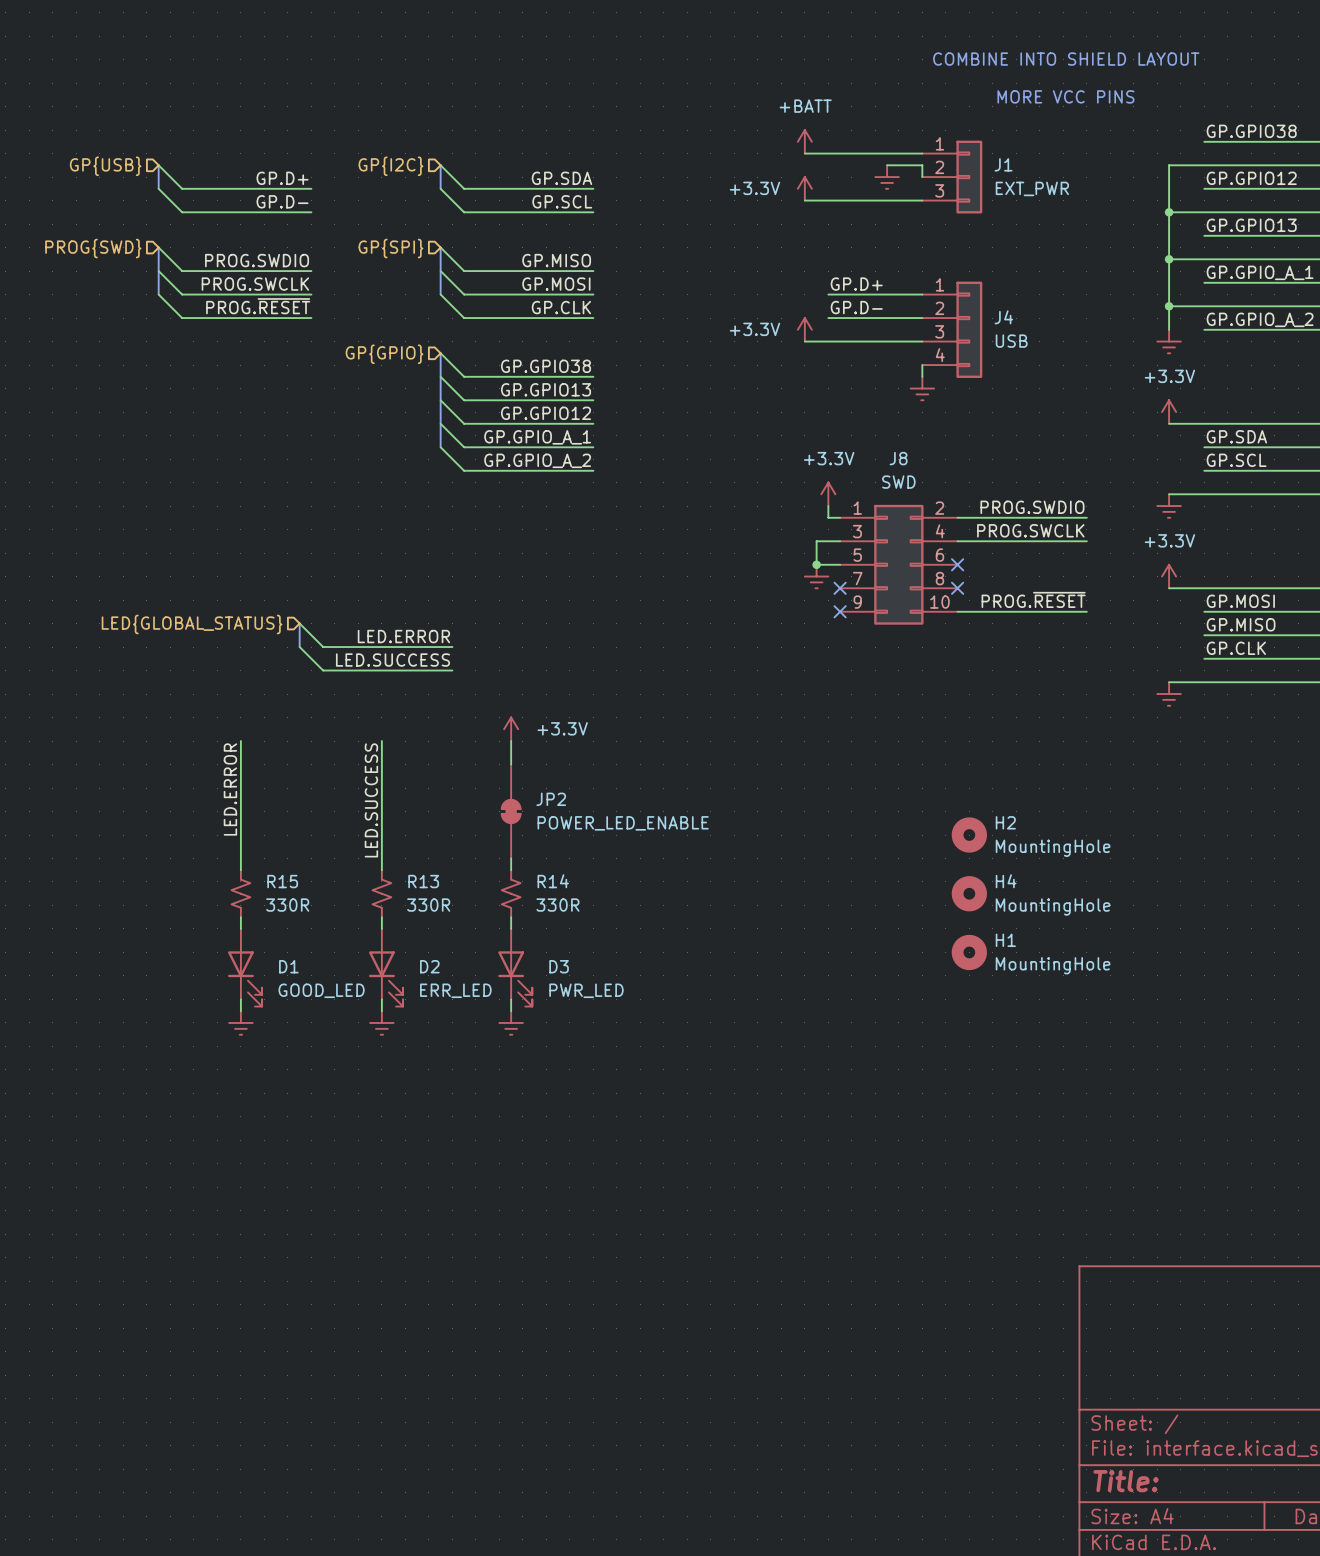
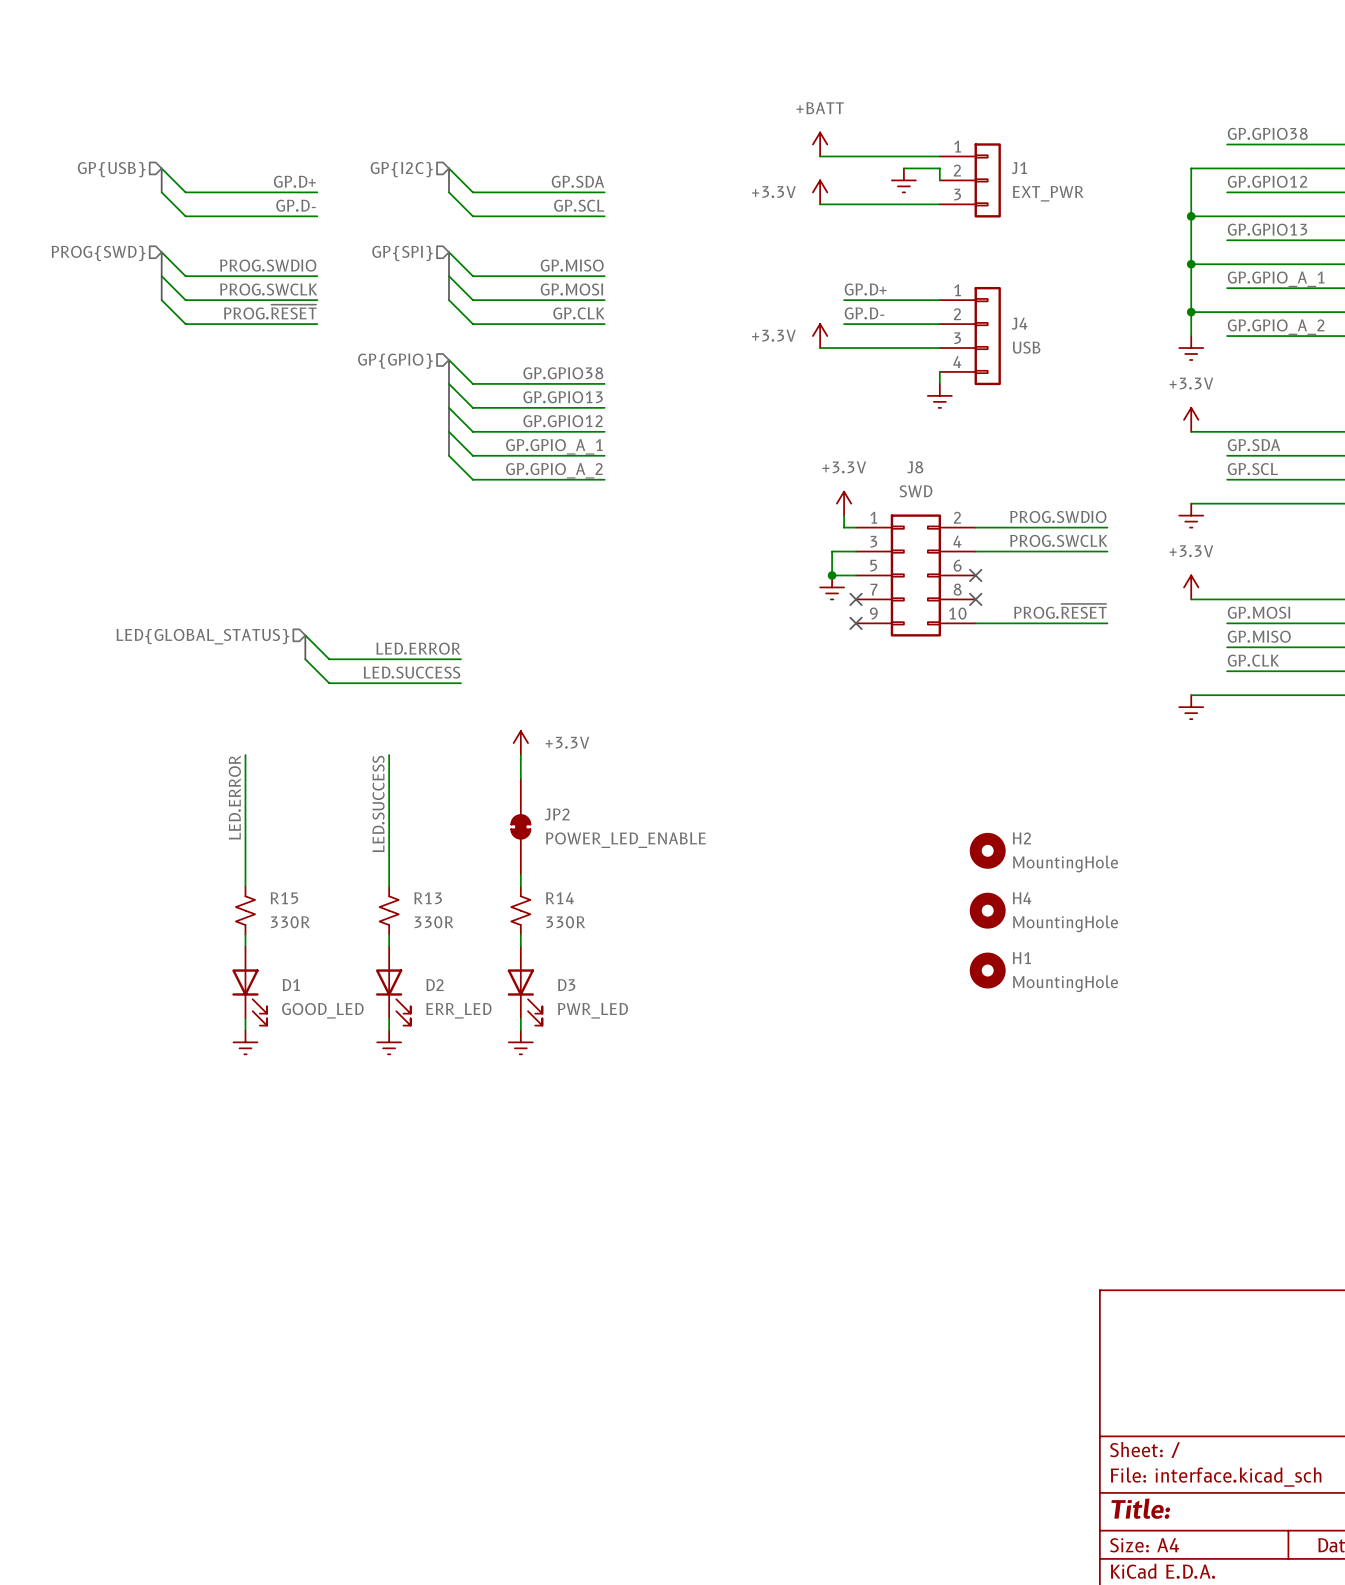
text: COMBINE INTO SHIELD LAYOUT (1066, 59) -> none
text: MORE VCC PINS (1065, 96) -> none

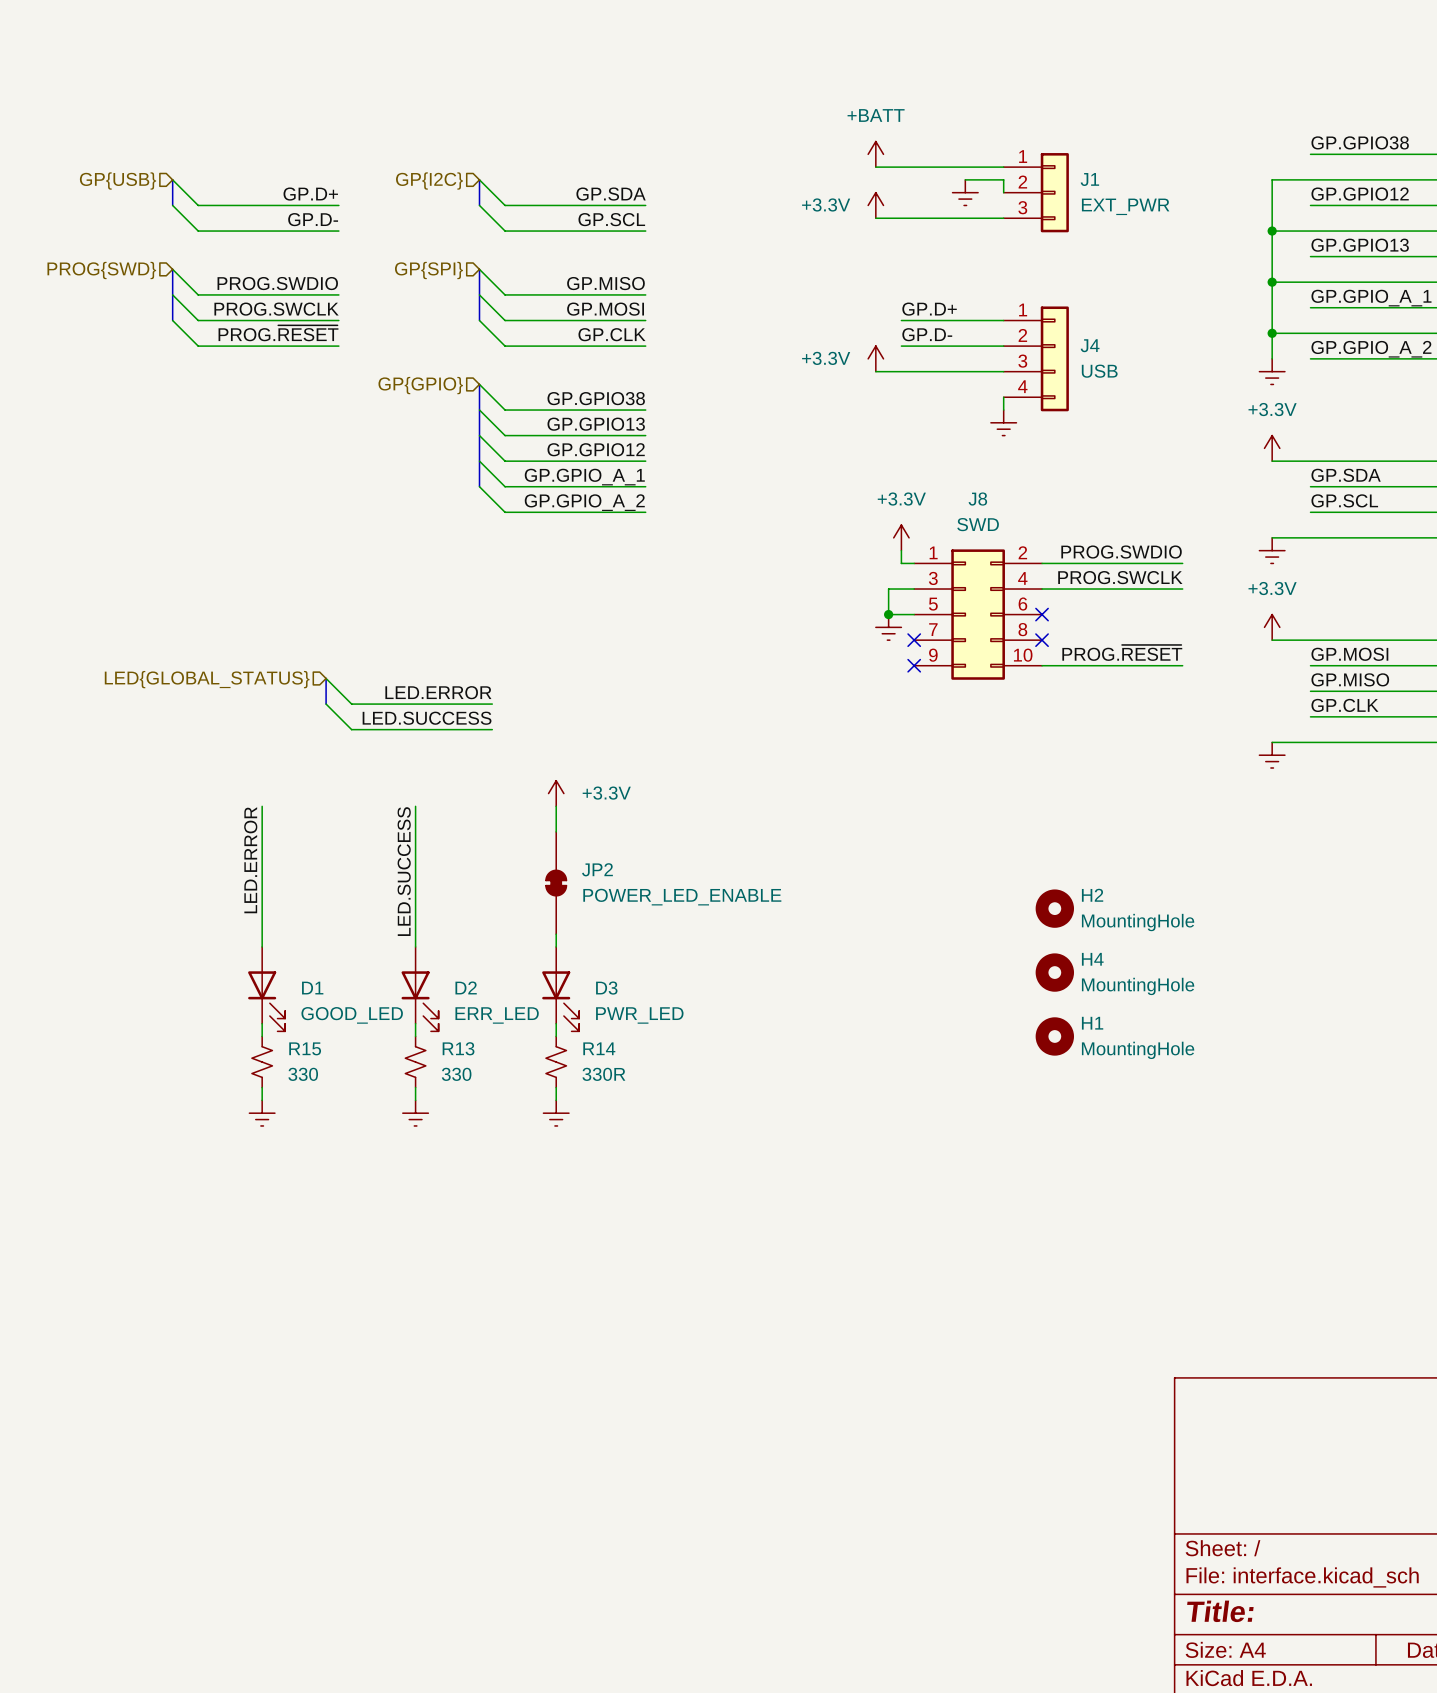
R15 position: (245, 910) -> (262, 1062)
R13 position: (389, 910) -> (415, 1062)
R14 position: (520, 910) -> (556, 1062)
R15 value: 330R (290, 922) -> 330 (303, 1074)
R13 value: 330R (434, 922) -> 330 (456, 1074)
D1 position: (249, 986) -> (266, 989)
D2 position: (393, 986) -> (420, 989)
D3 position: (525, 986) -> (560, 989)

